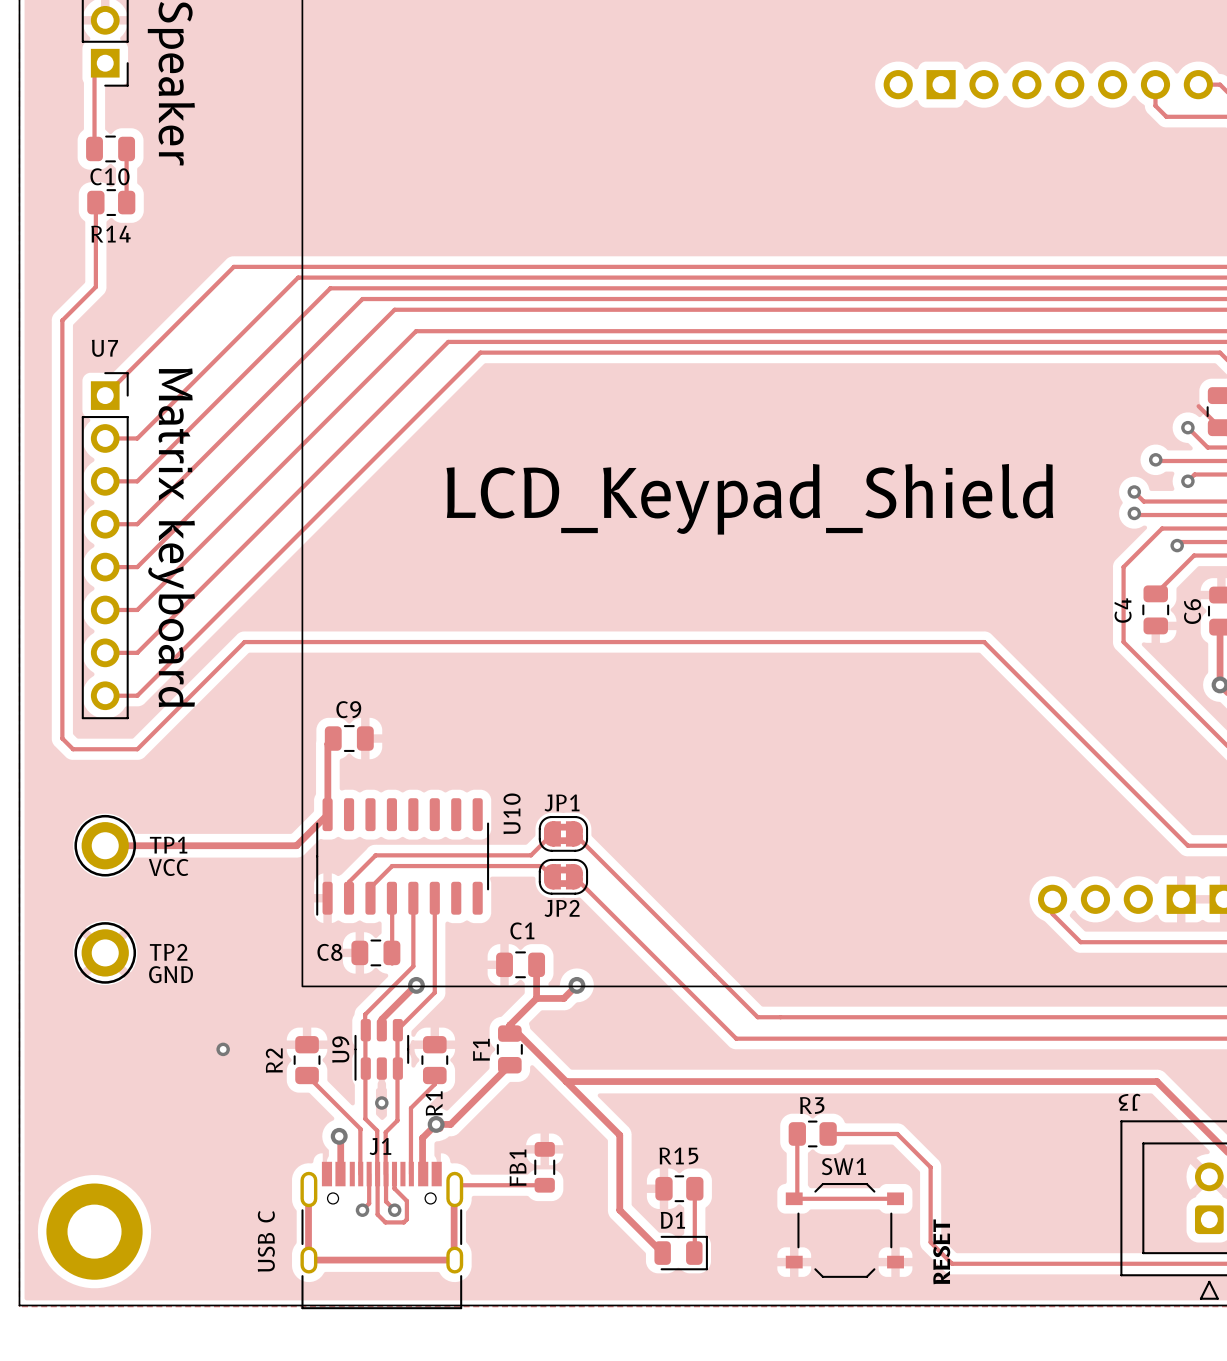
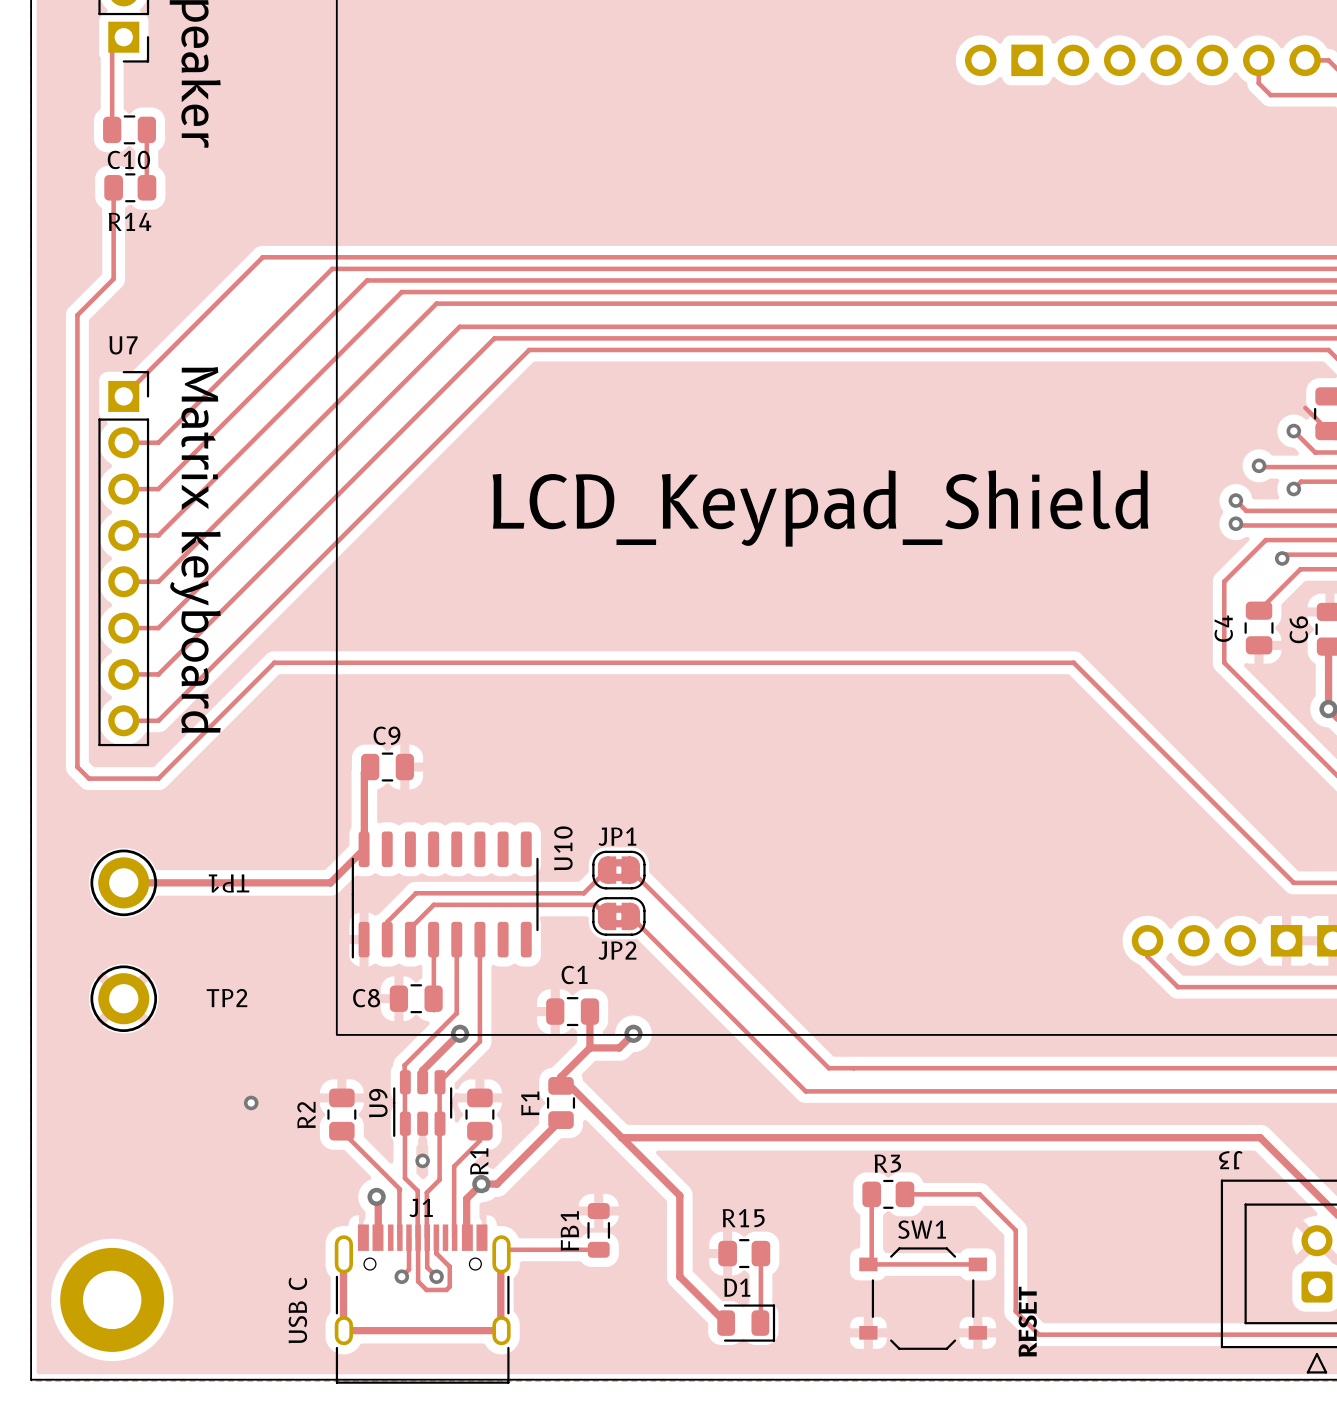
TP1 name rotation: 0° (168, 845) -> 180° (229, 883)
text: VCC (168, 867) -> none
TP2 name position: TP2 (168, 952) -> TP2 (227, 998)
text: GND (171, 974) -> none

